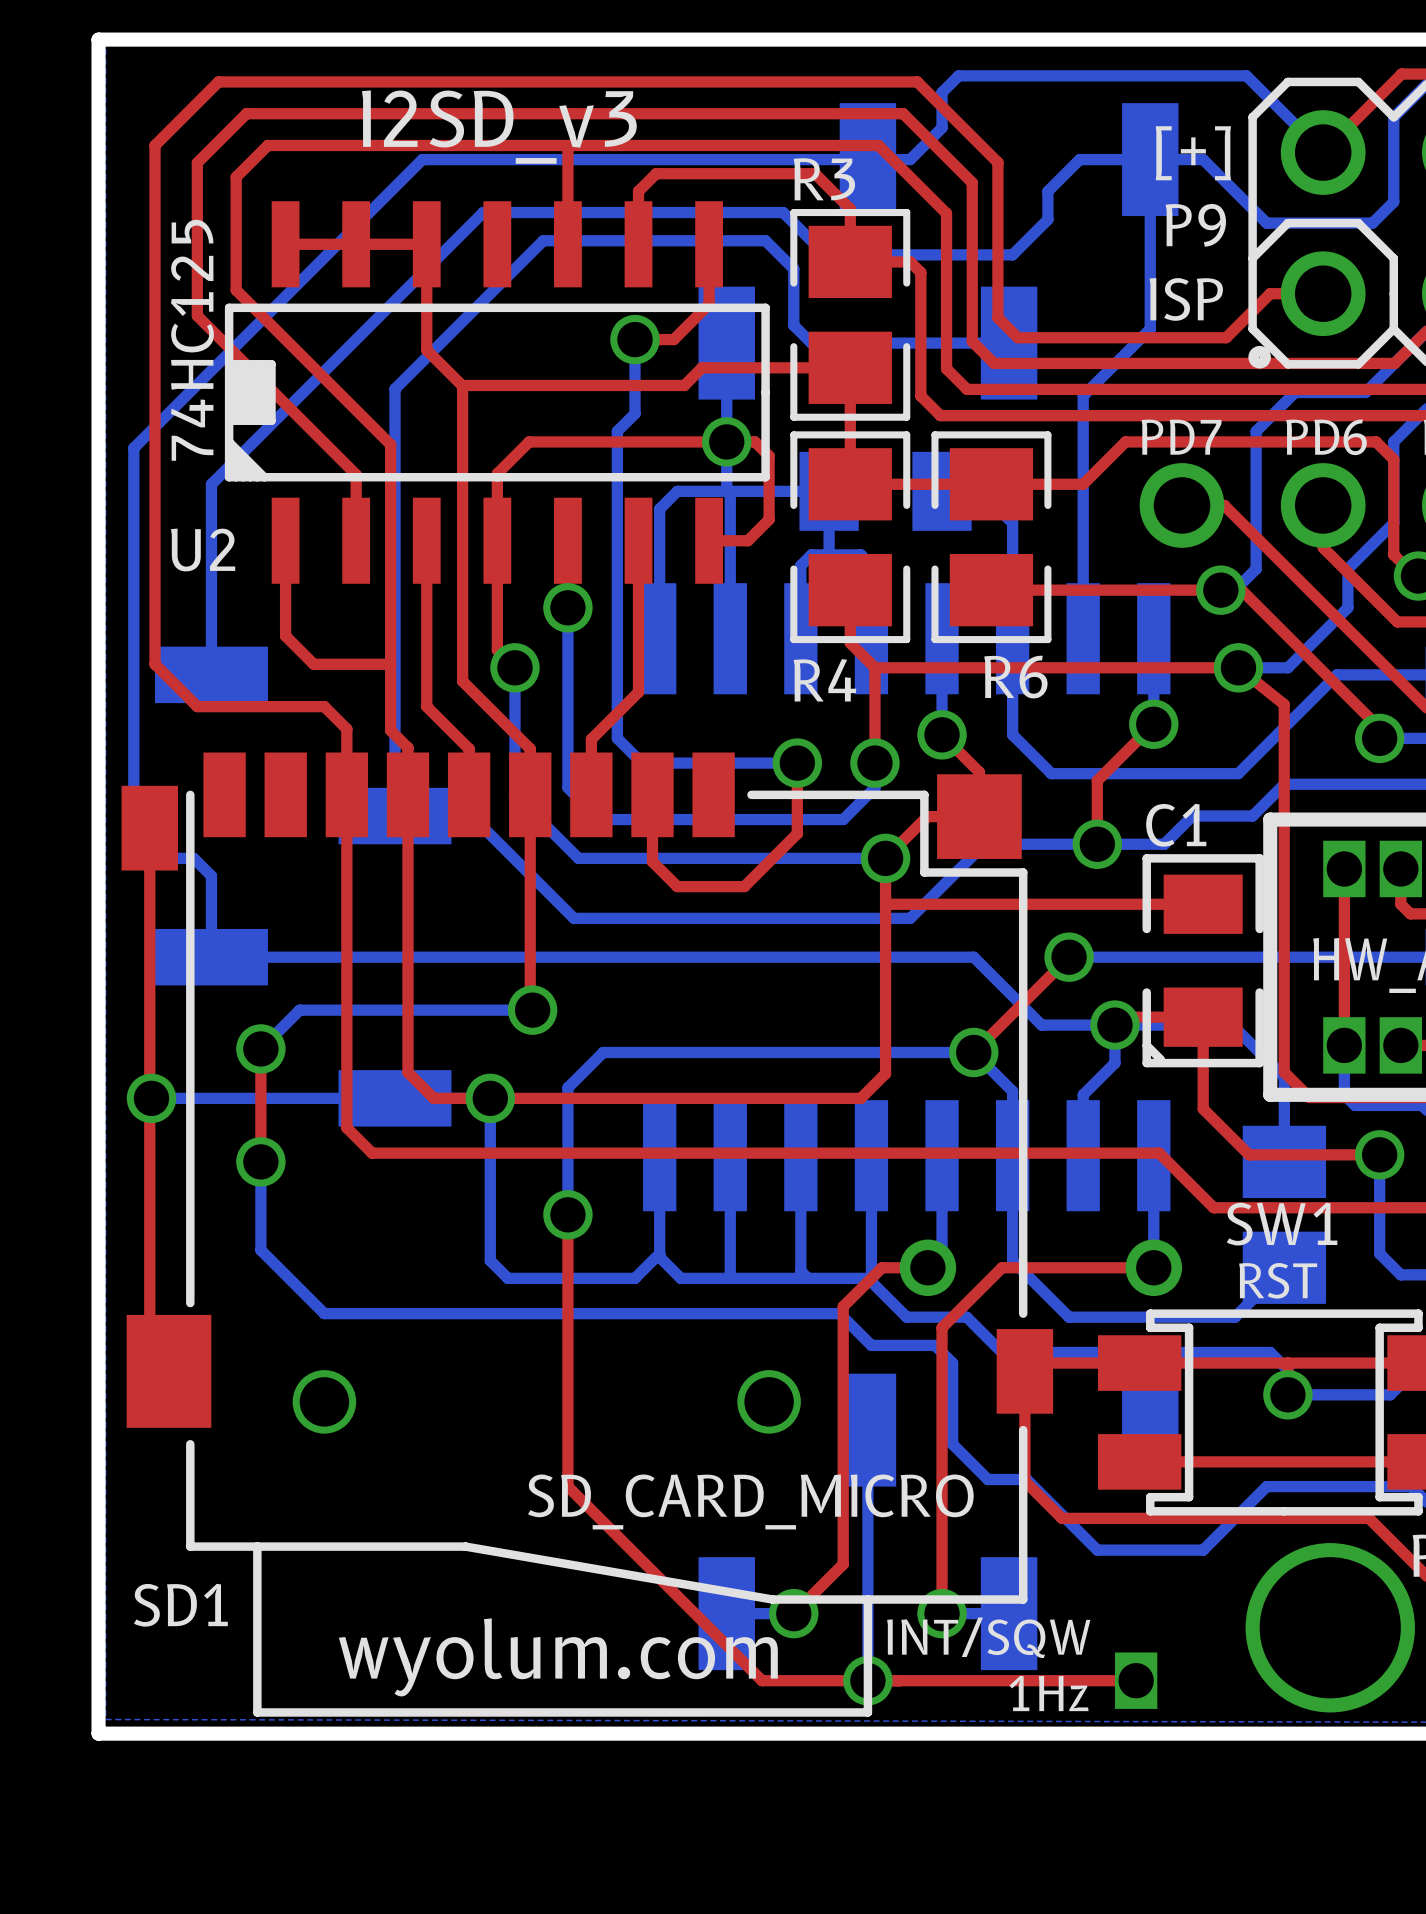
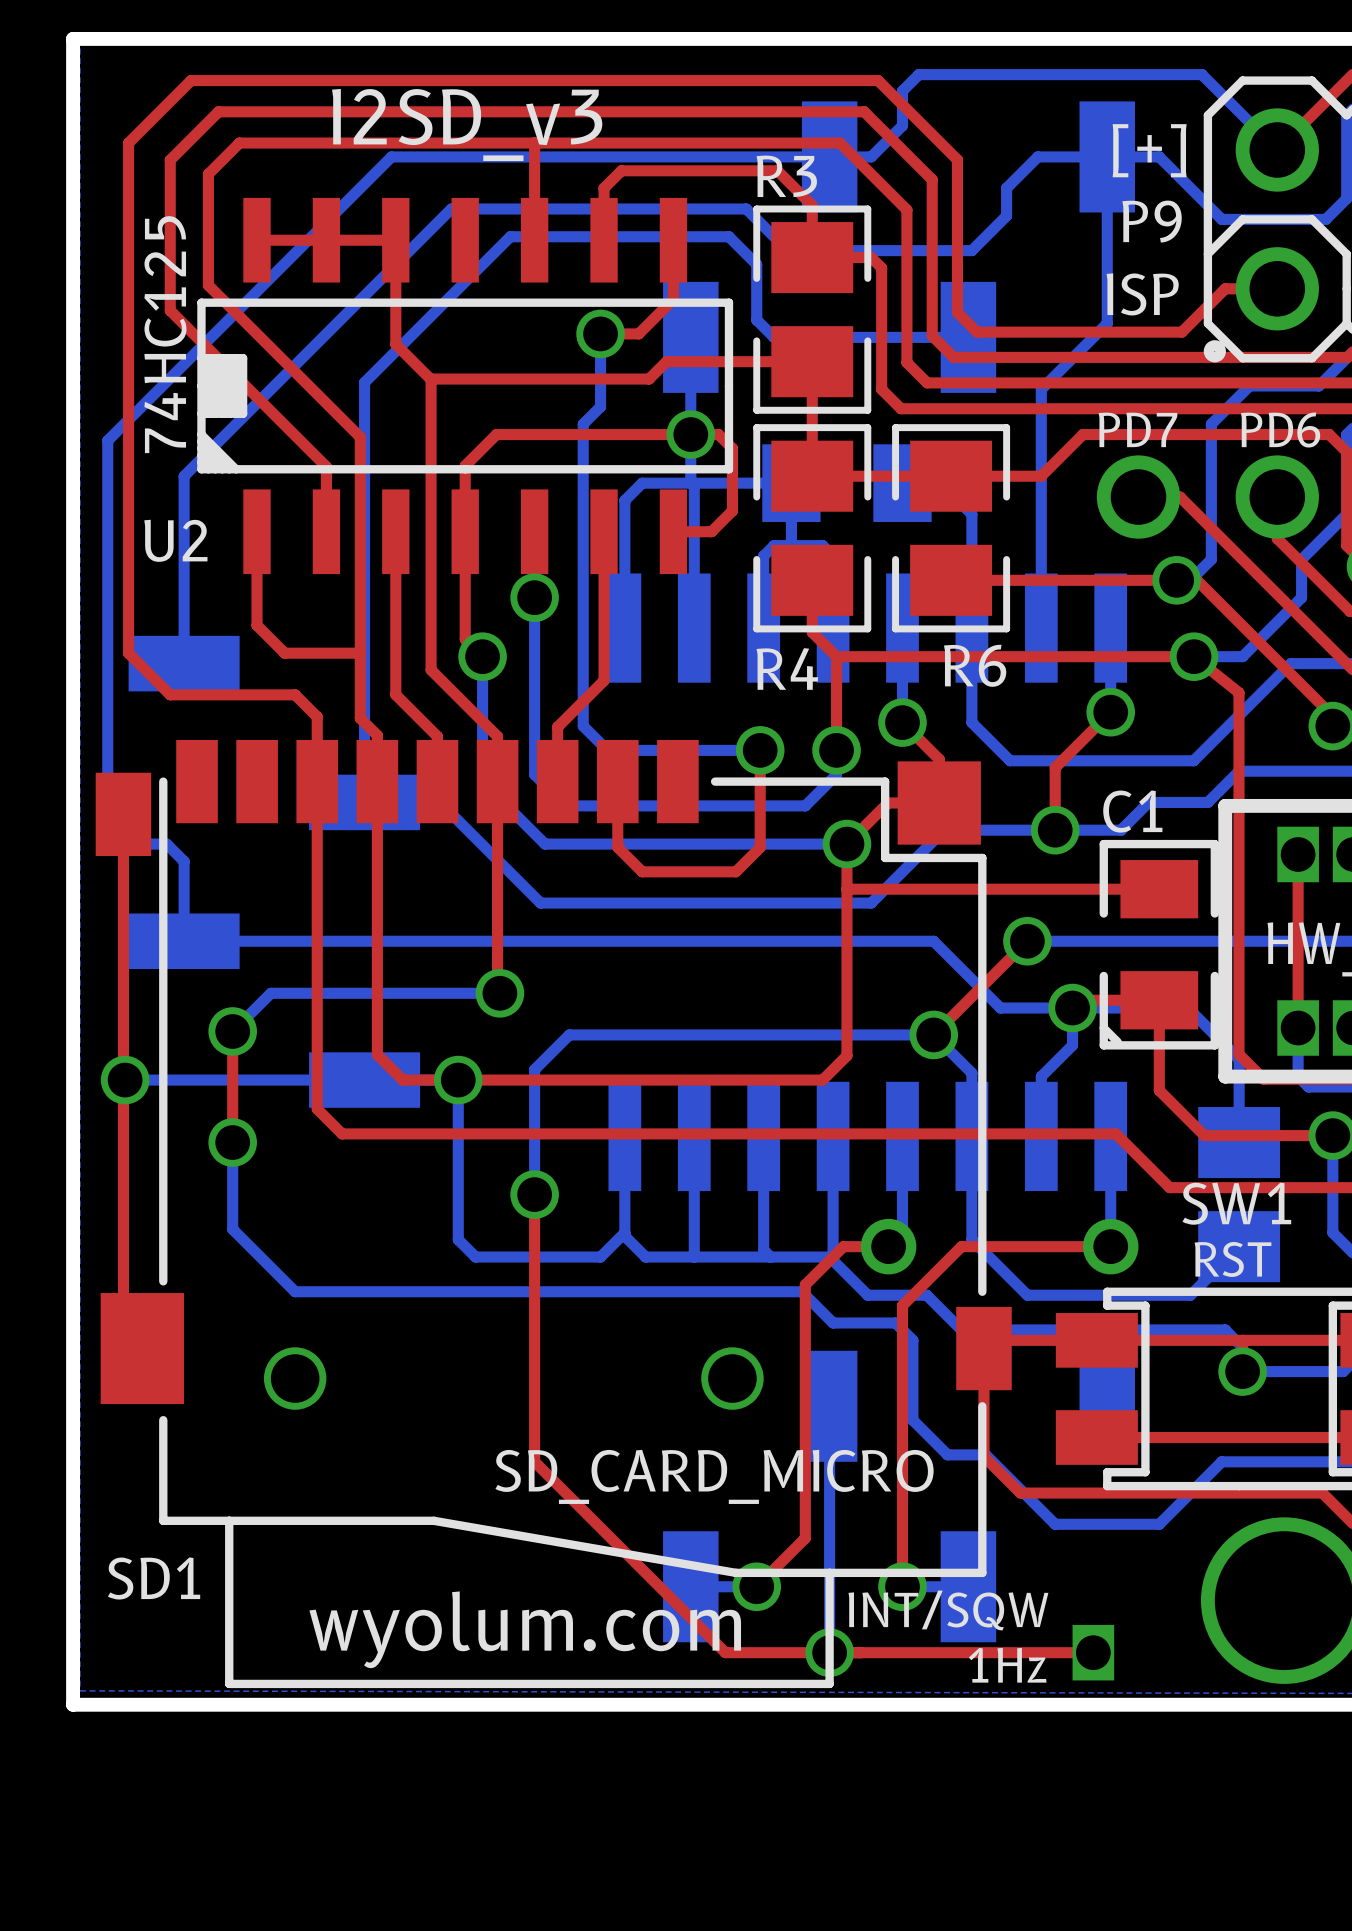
top track: (797, 833) (744, 886) -> (760, 819) (760, 847) (735, 871) (708, 871)

